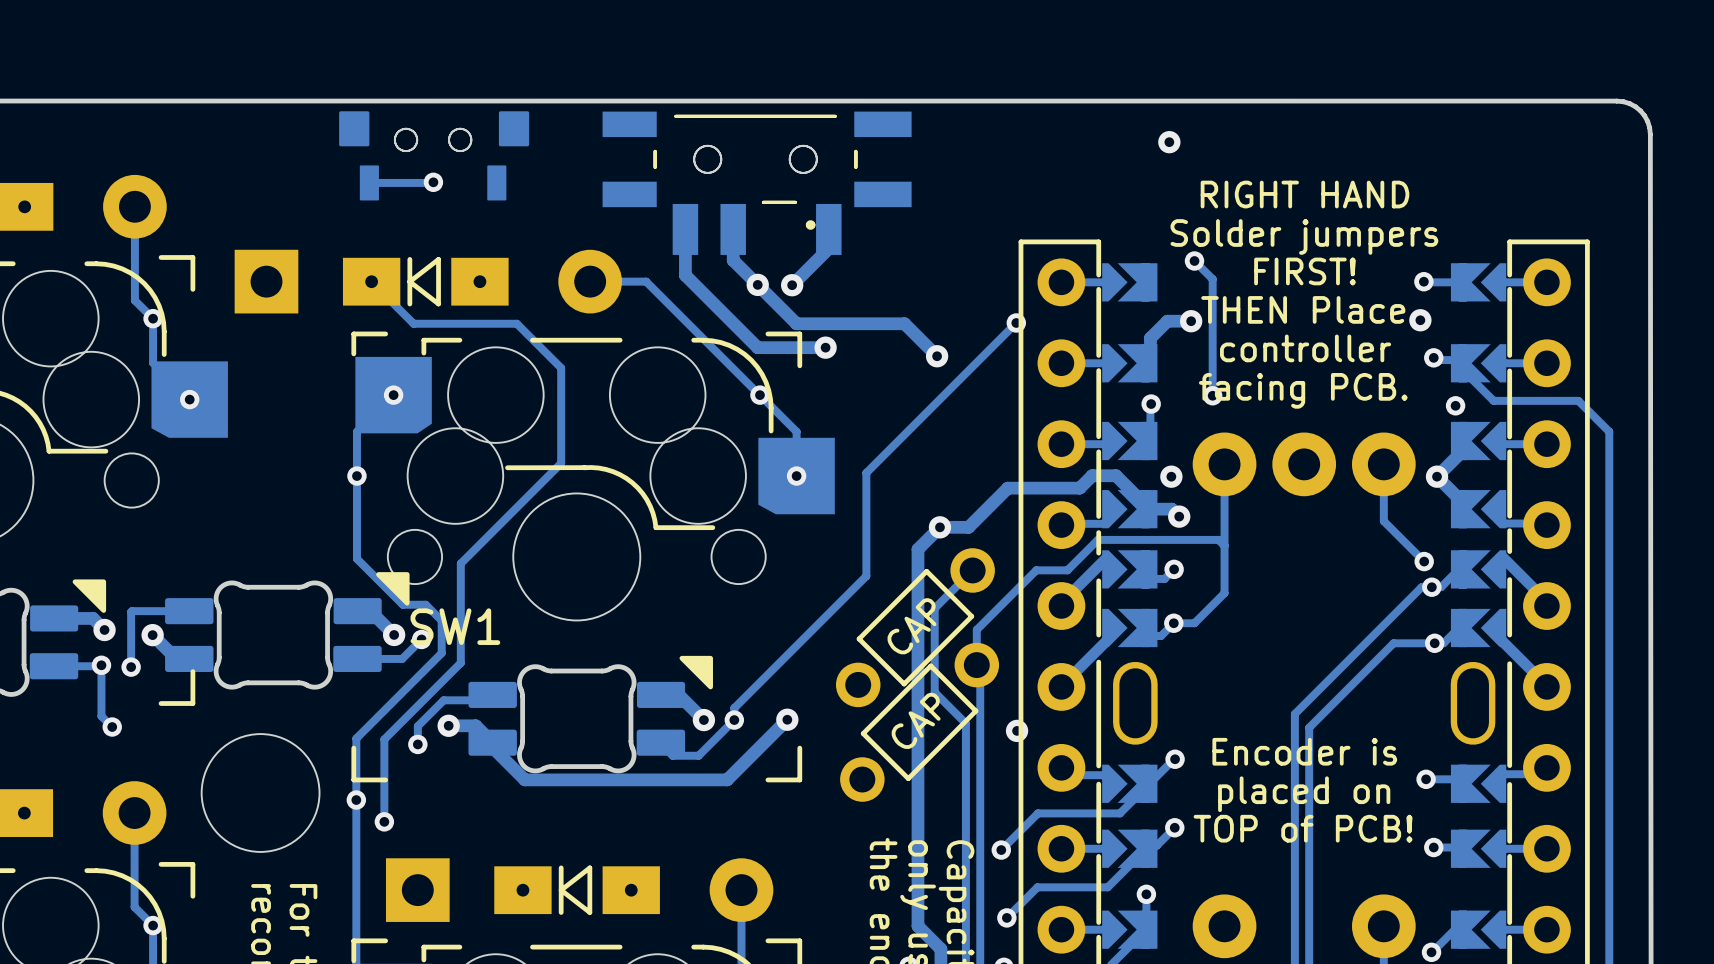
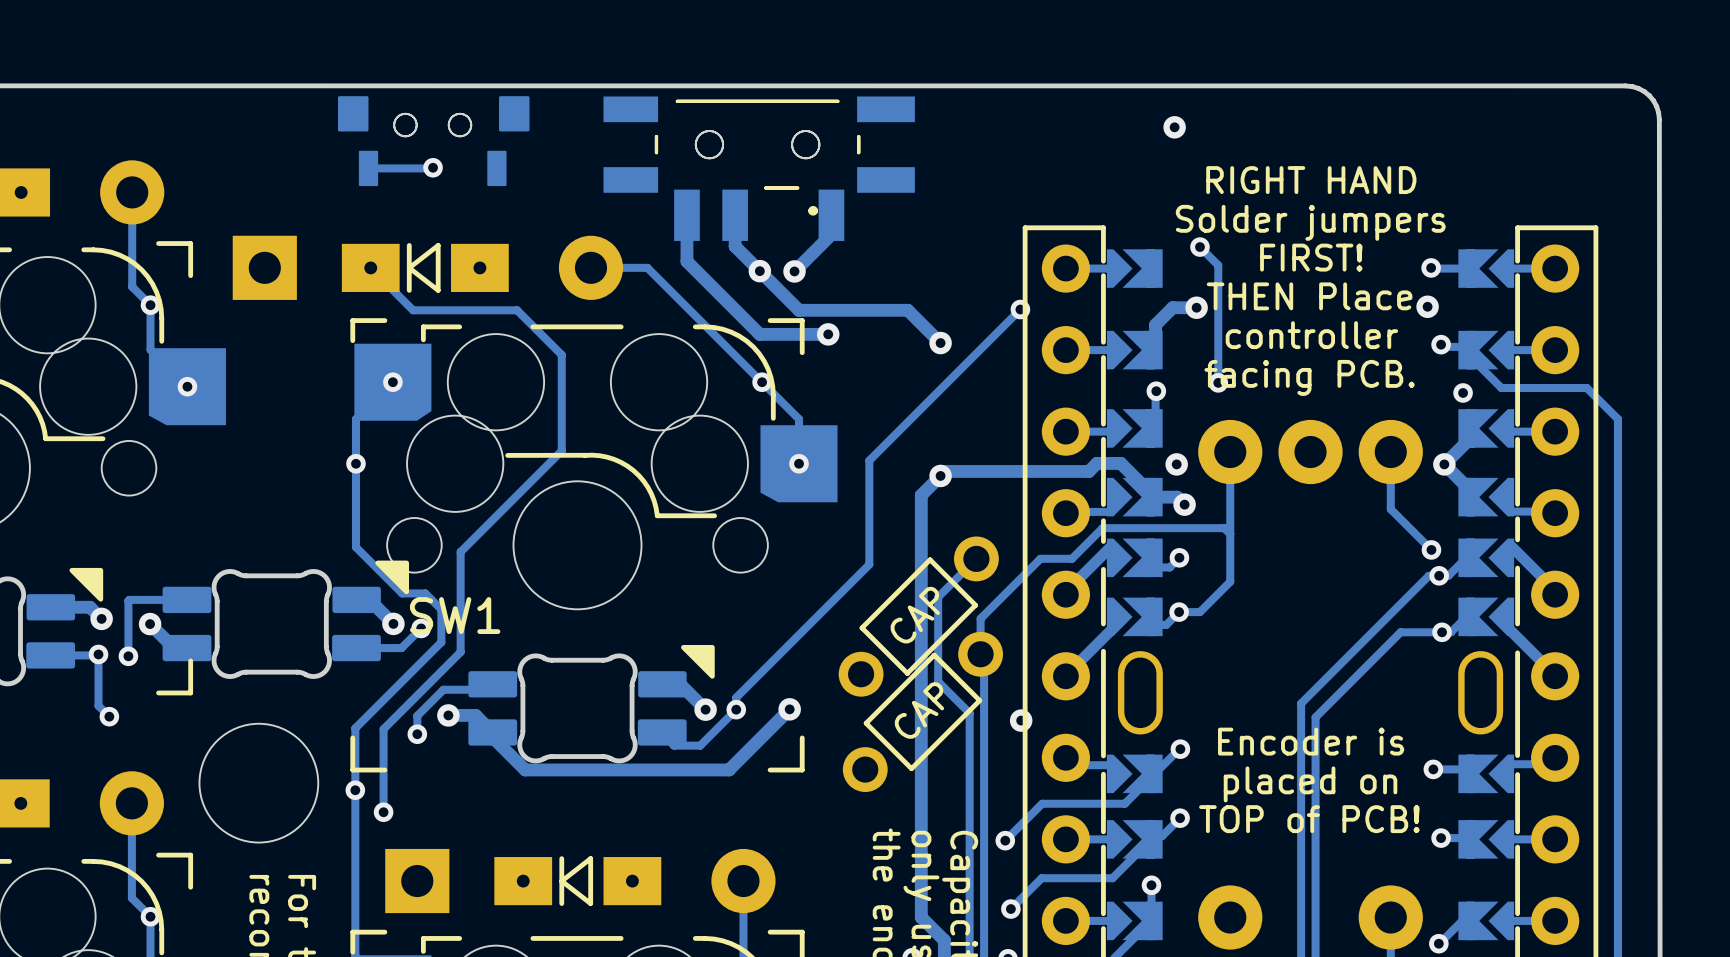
track: (1084, 483) (1079, 488) (1007, 488) (968, 527) (939, 527) (917, 549) -> (1088, 471) (945, 471) (921, 495) (921, 537)
via position: (939, 527) -> (940, 475)

